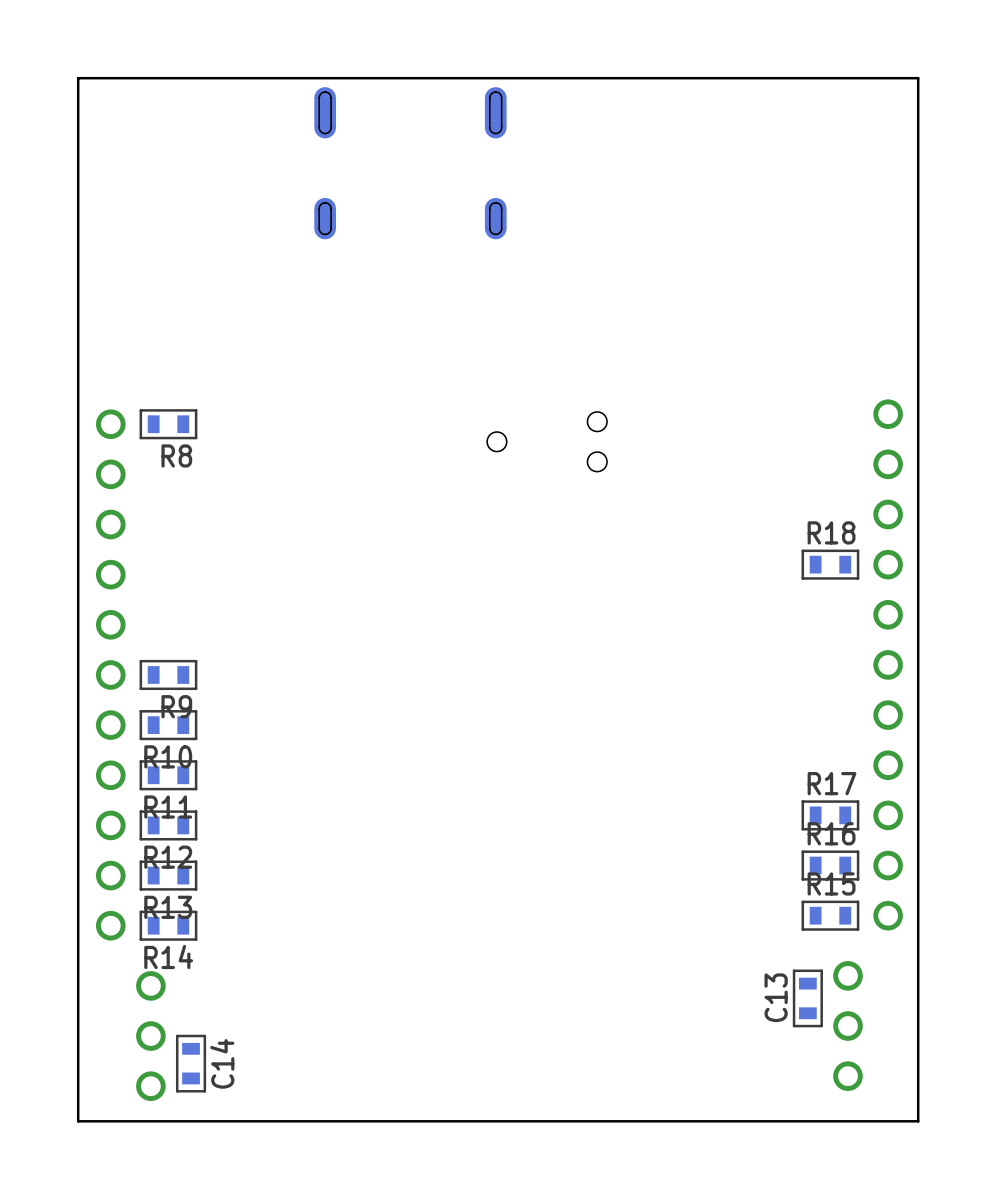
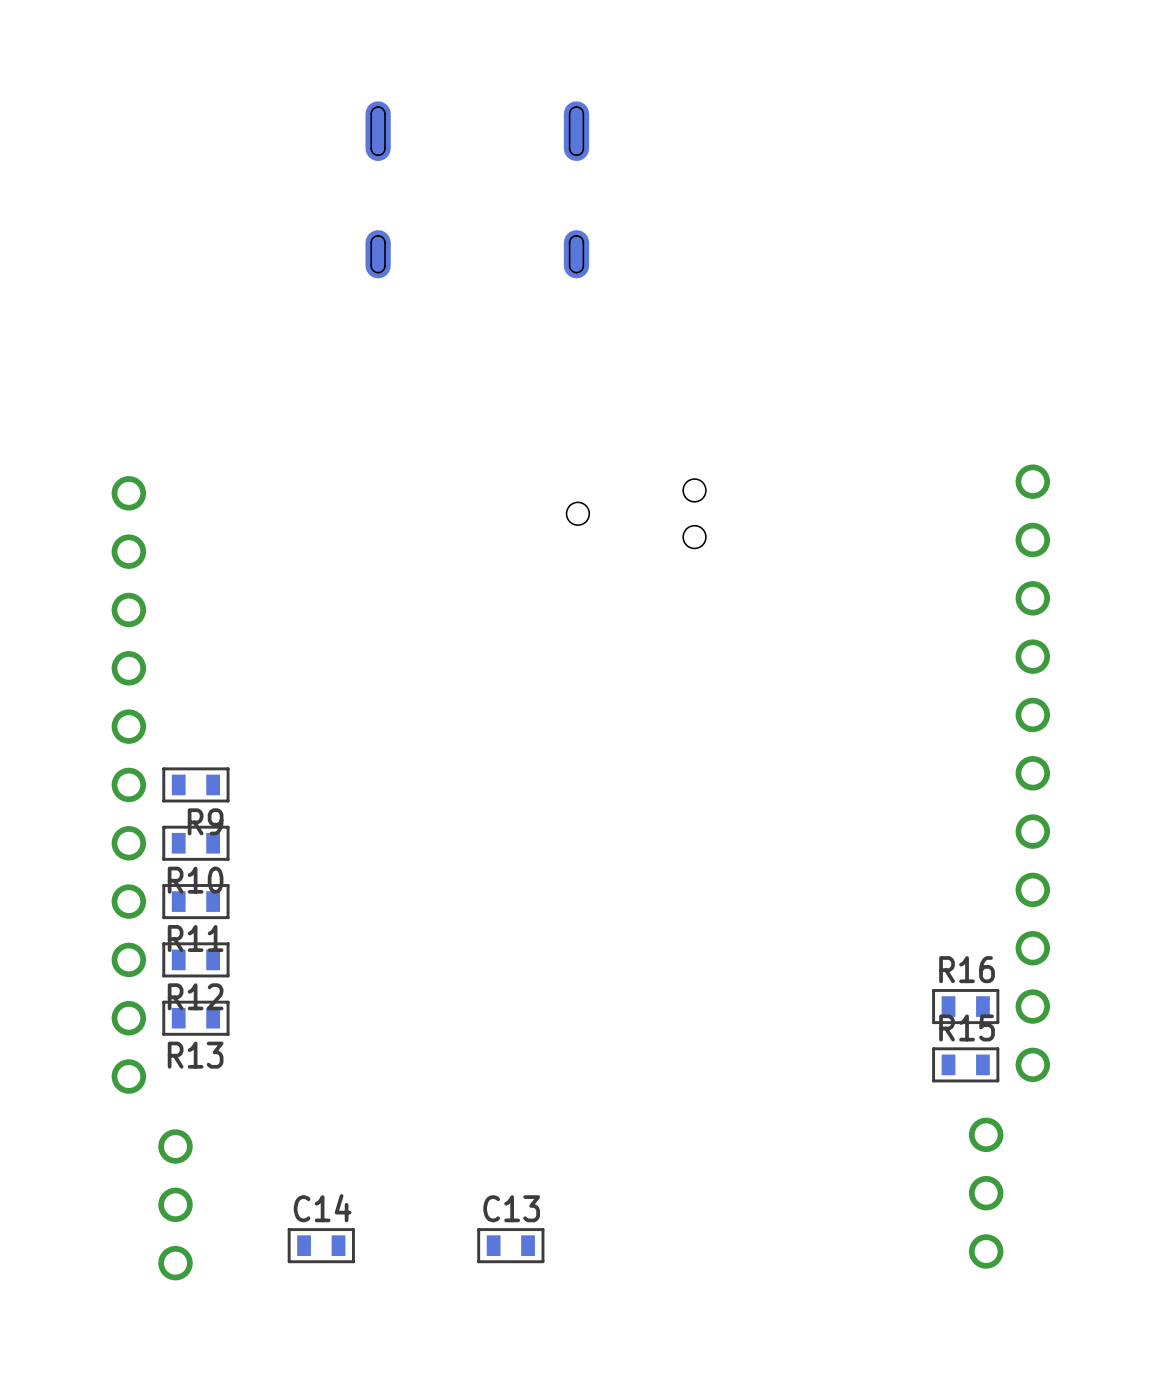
board edge: (918, 78) (78, 78) (78, 1121) (918, 1121) (918, 78) -> none
R8: (168, 424) -> none
R18: (830, 564) -> none
R17: (830, 815) -> none
R14: (168, 925) -> none
C13 rotation: 0° (807, 998) -> 90° clockwise (510, 1245)
C13 position: (807, 998) -> (510, 1245)
C14 rotation: 0° (191, 1063) -> 90° clockwise (321, 1245)
C14 position: (191, 1063) -> (321, 1245)
C14 name position: C14 (222, 1063) -> C14 (322, 1208)

